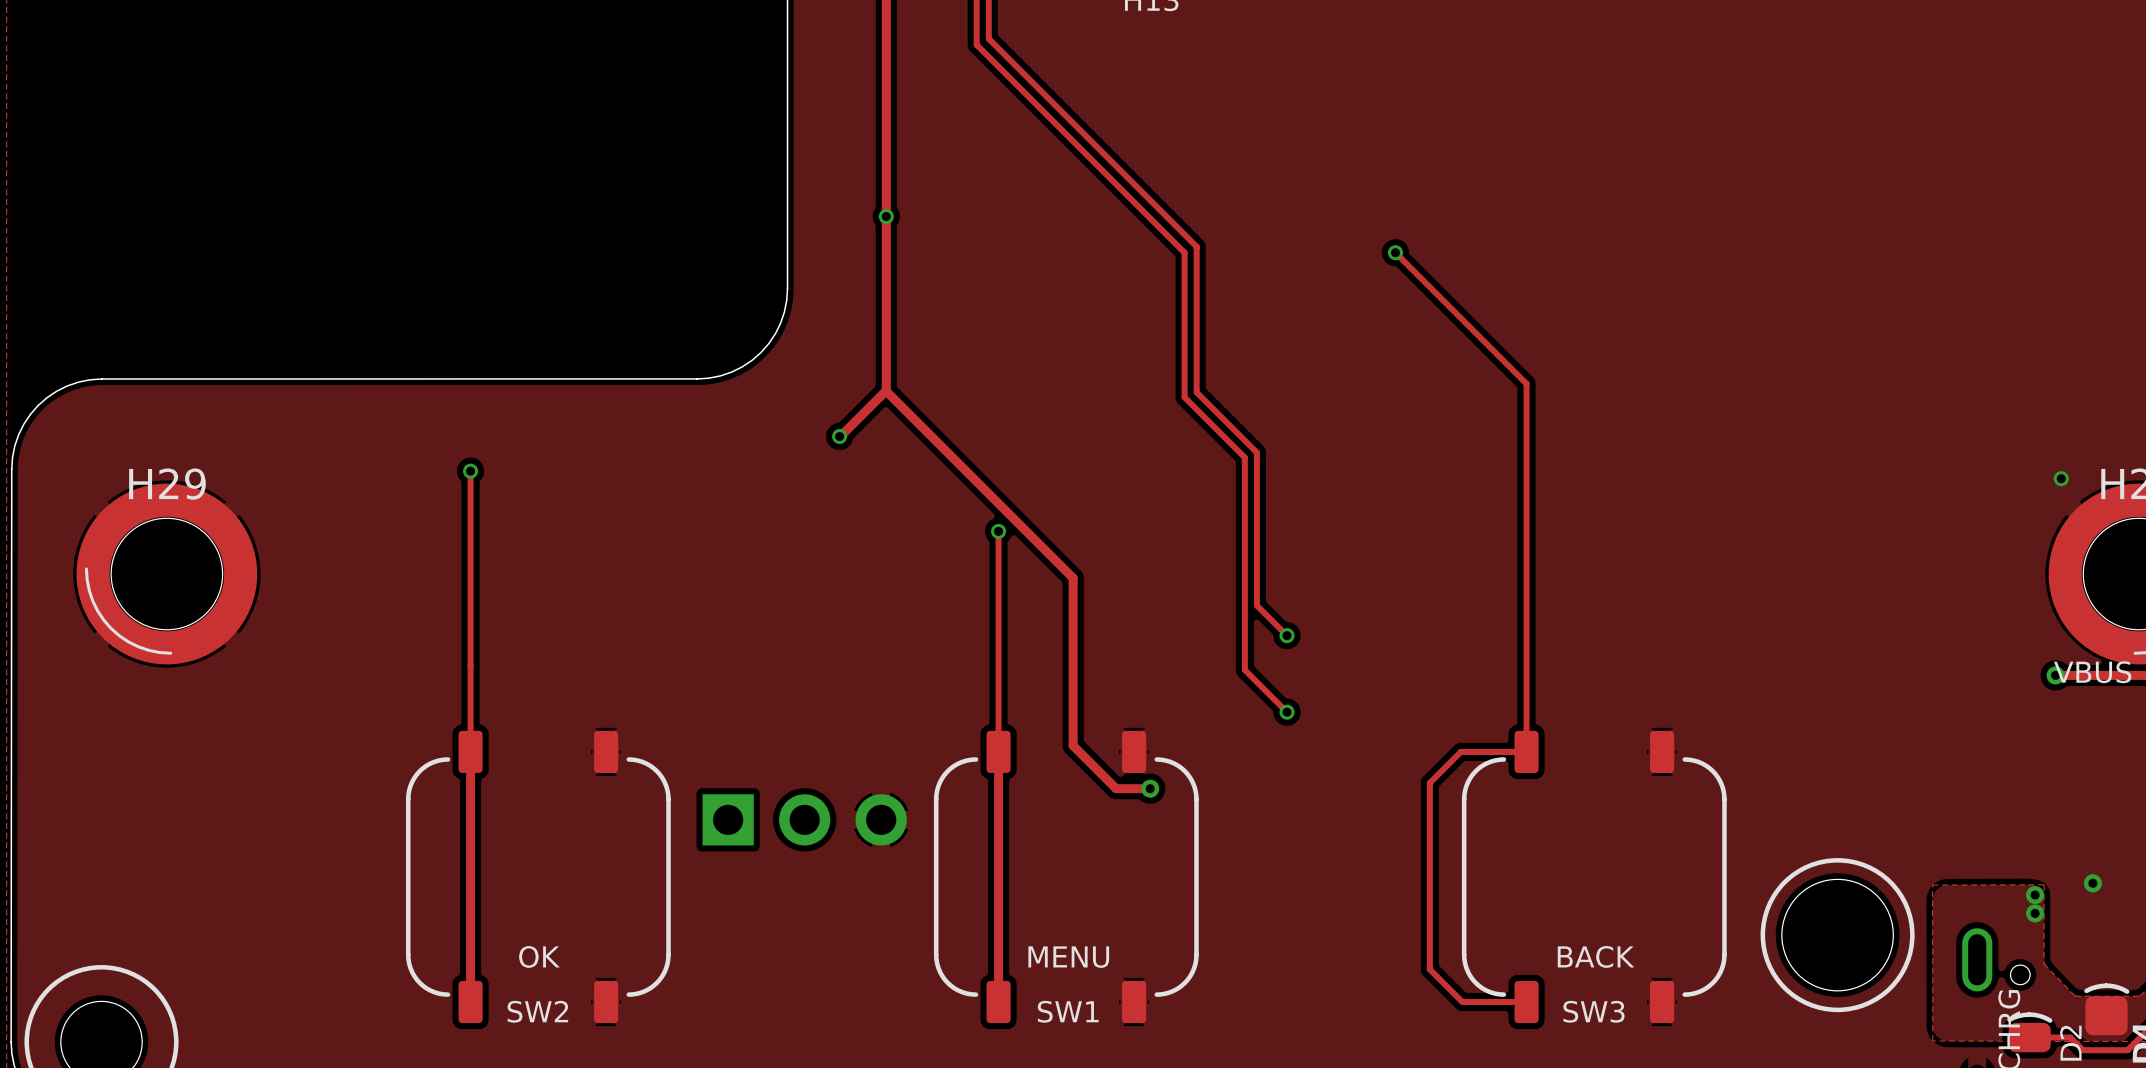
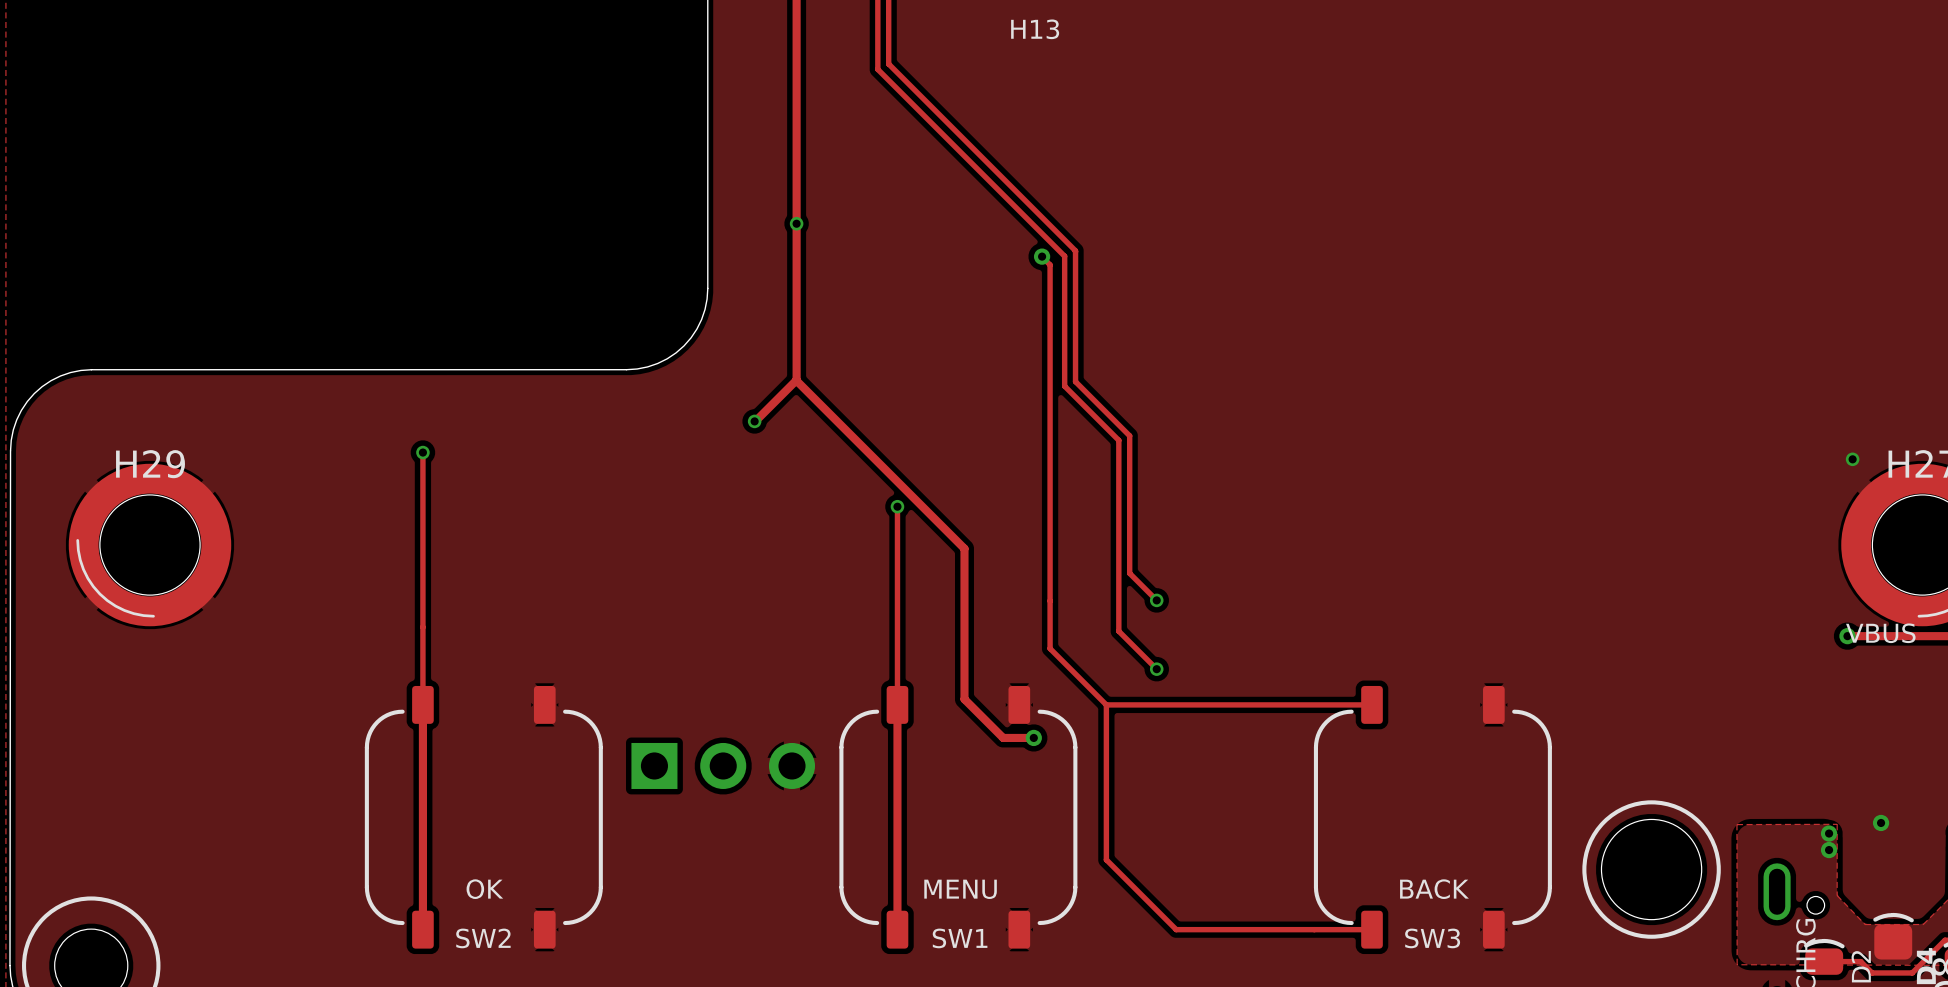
track: (1395, 252) (1526, 383) (1526, 751) -> none
via: (1395, 252) -> none
track: none -> (1042, 256) (1050, 264) (1050, 648) (1106, 704)
via: none -> (1042, 256)
track: none -> (1106, 704) (1312, 704)
track: (1460, 751) (1429, 782) (1429, 969) (1462, 1001) -> (1106, 704) (1106, 859) (1176, 929) (1314, 929)

